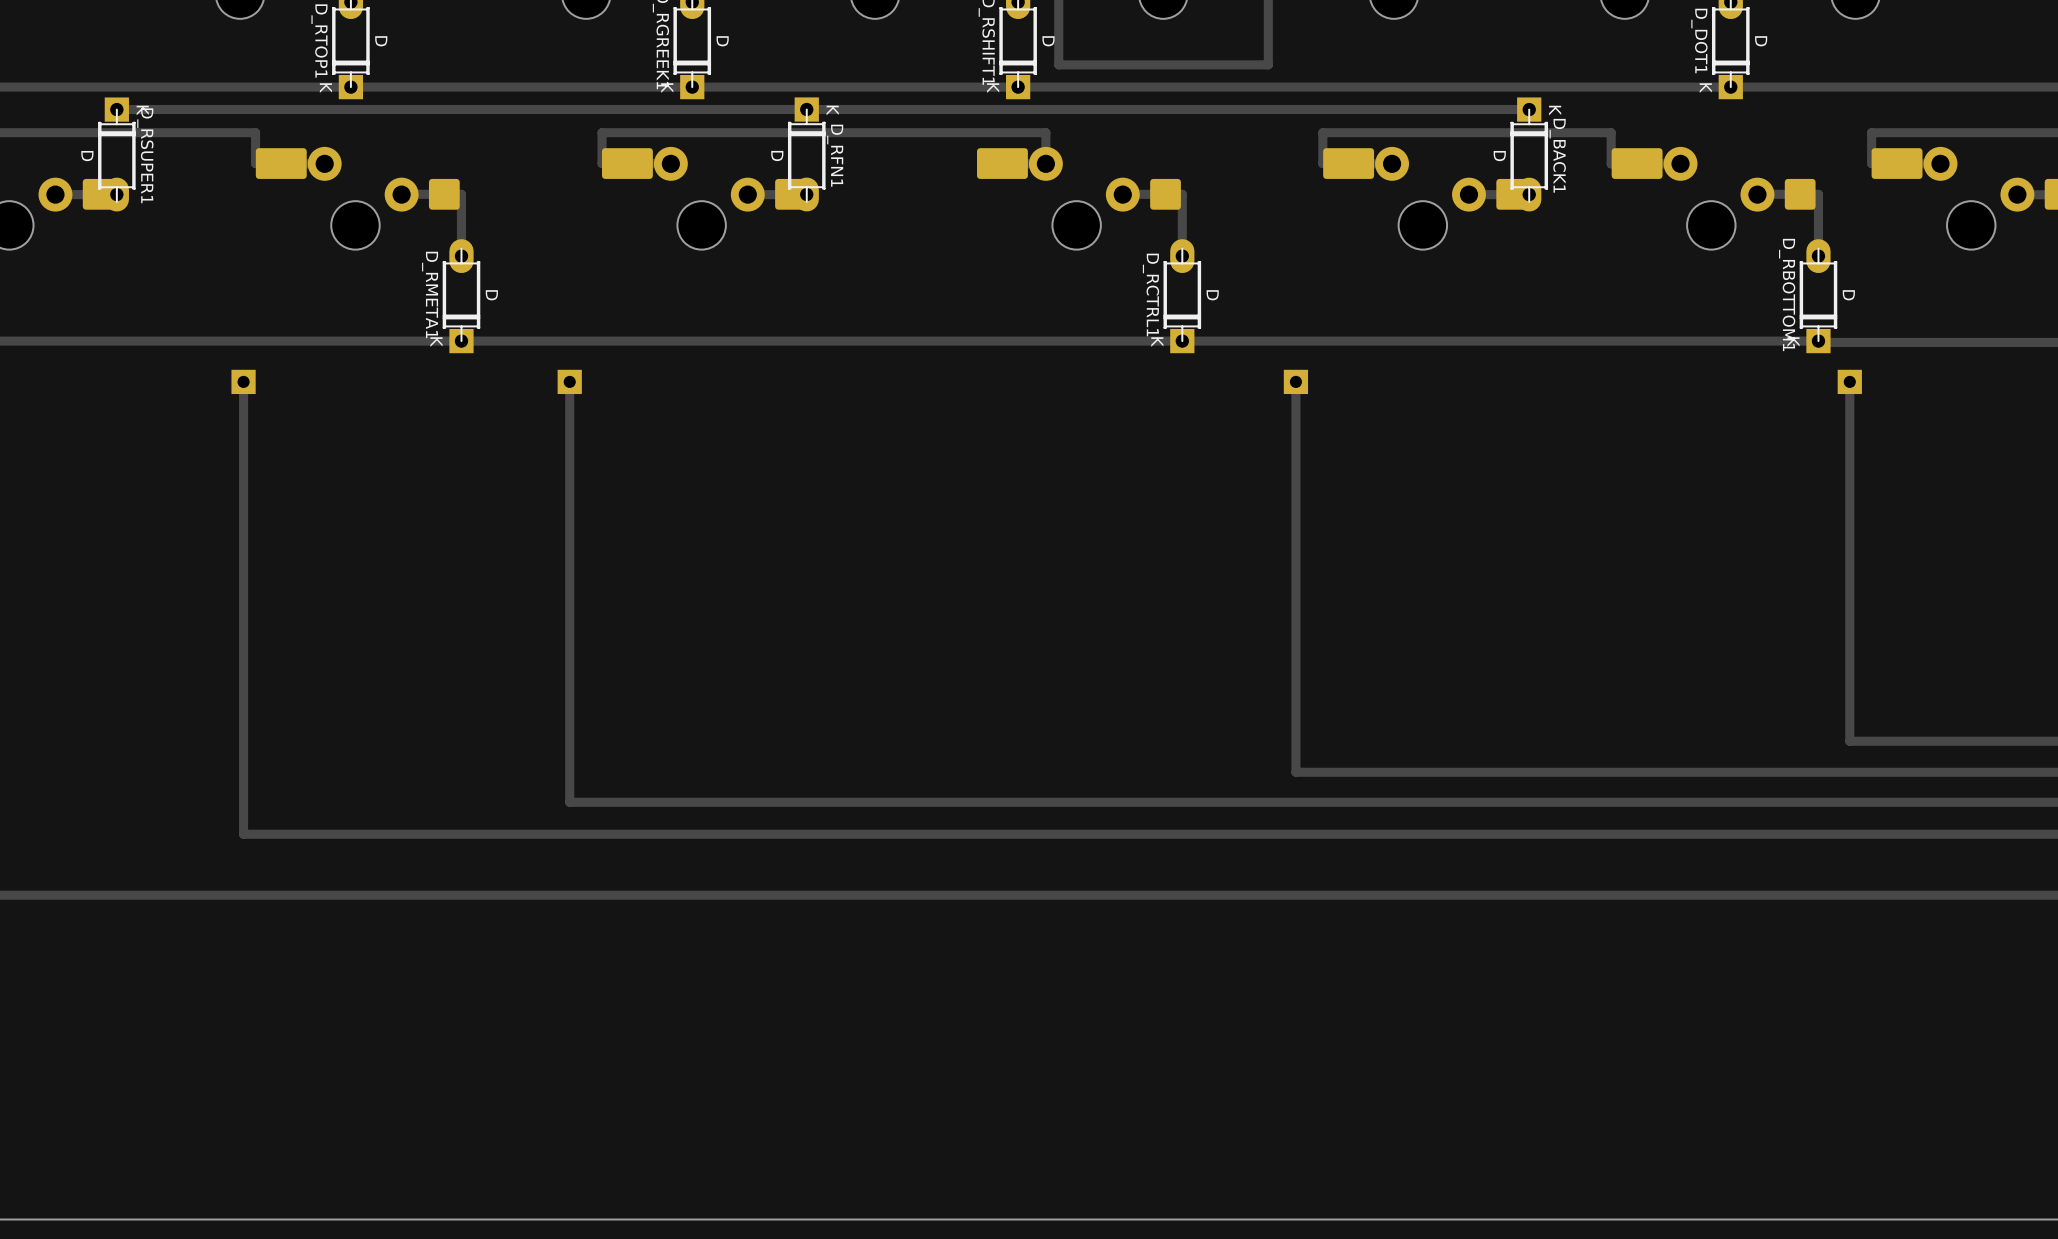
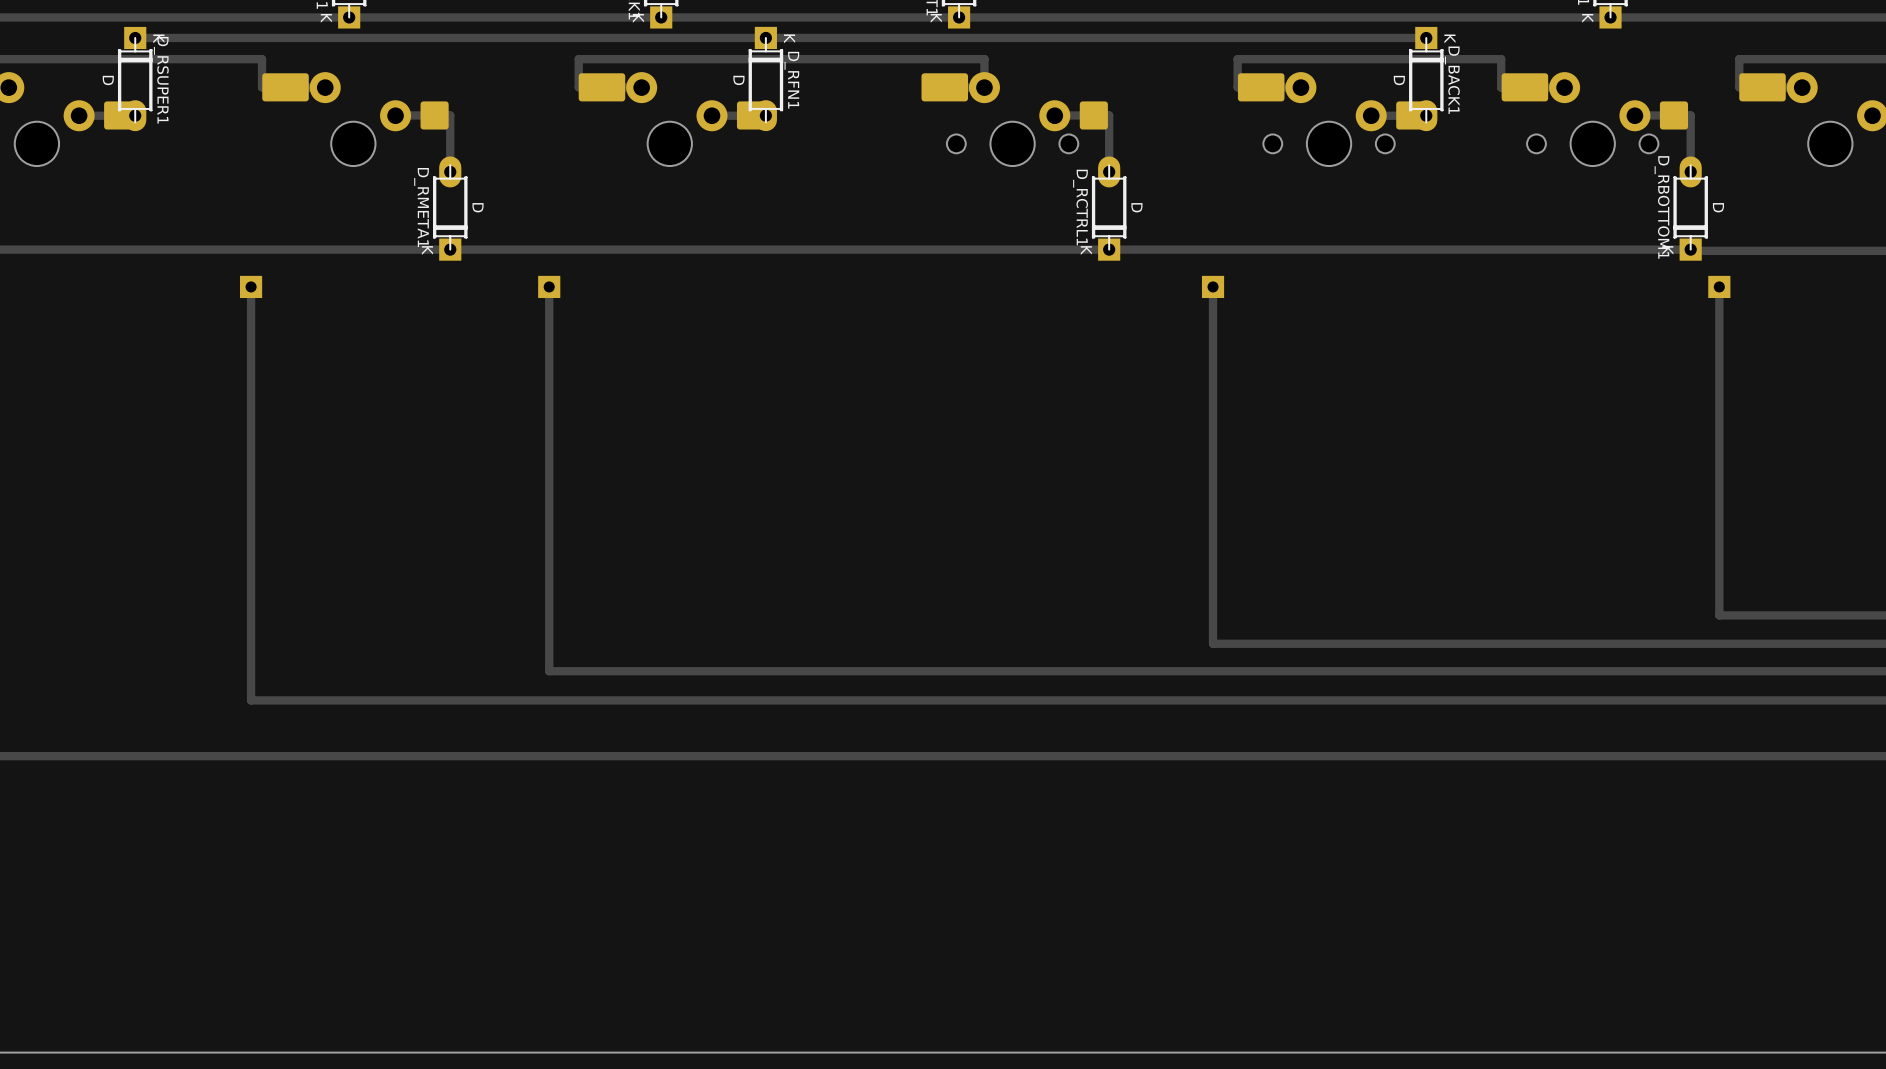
part footprint: [977, 146, 1181, 250] -> [921, 72, 1108, 167]
part footprint: [1323, 146, 1528, 250] -> [1237, 72, 1425, 167]
part footprint: [1611, 146, 1816, 250] -> [1501, 72, 1689, 167]

